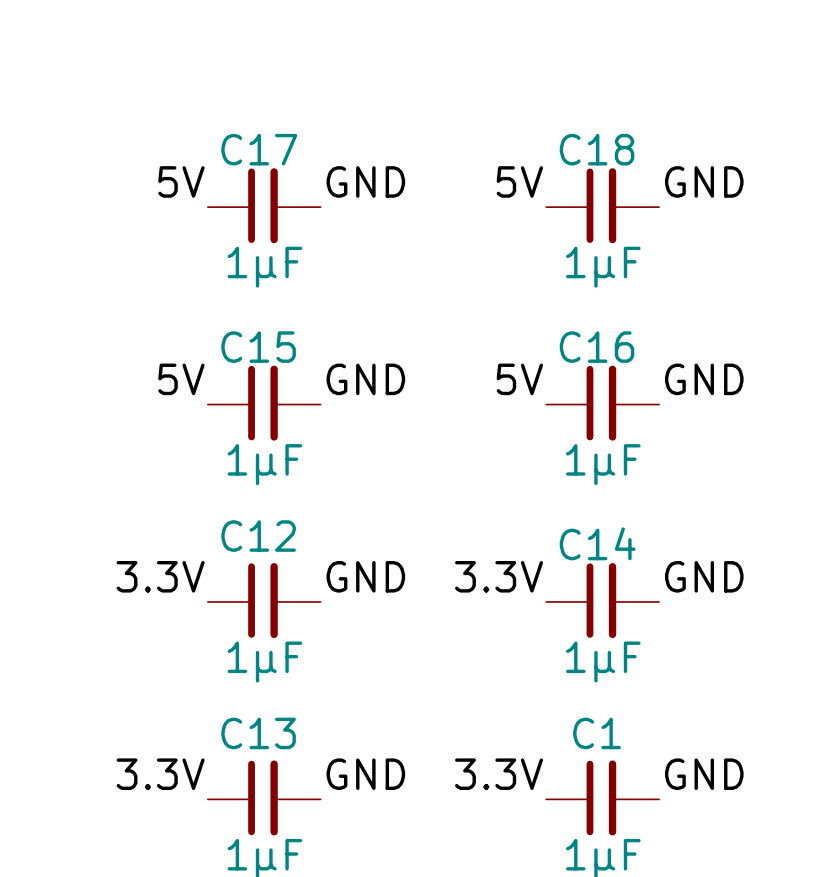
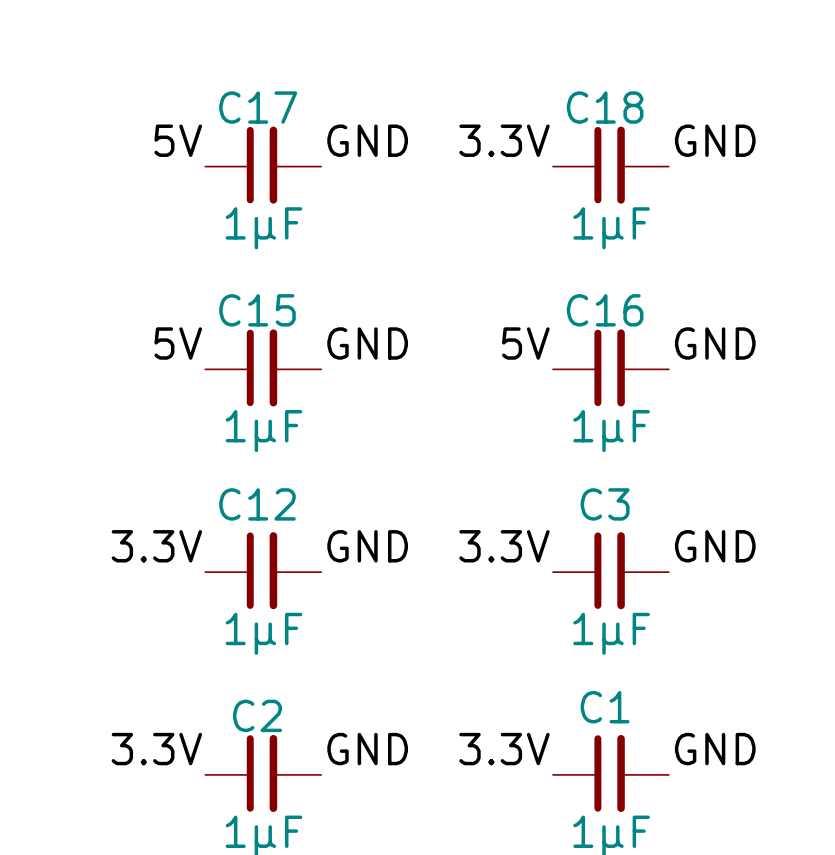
label: 5V (519, 181) -> 3.3V (504, 140)
C14 name: C14 (597, 543) -> C3 (605, 504)
C13 name: C13 (258, 733) -> C2 (257, 715)

